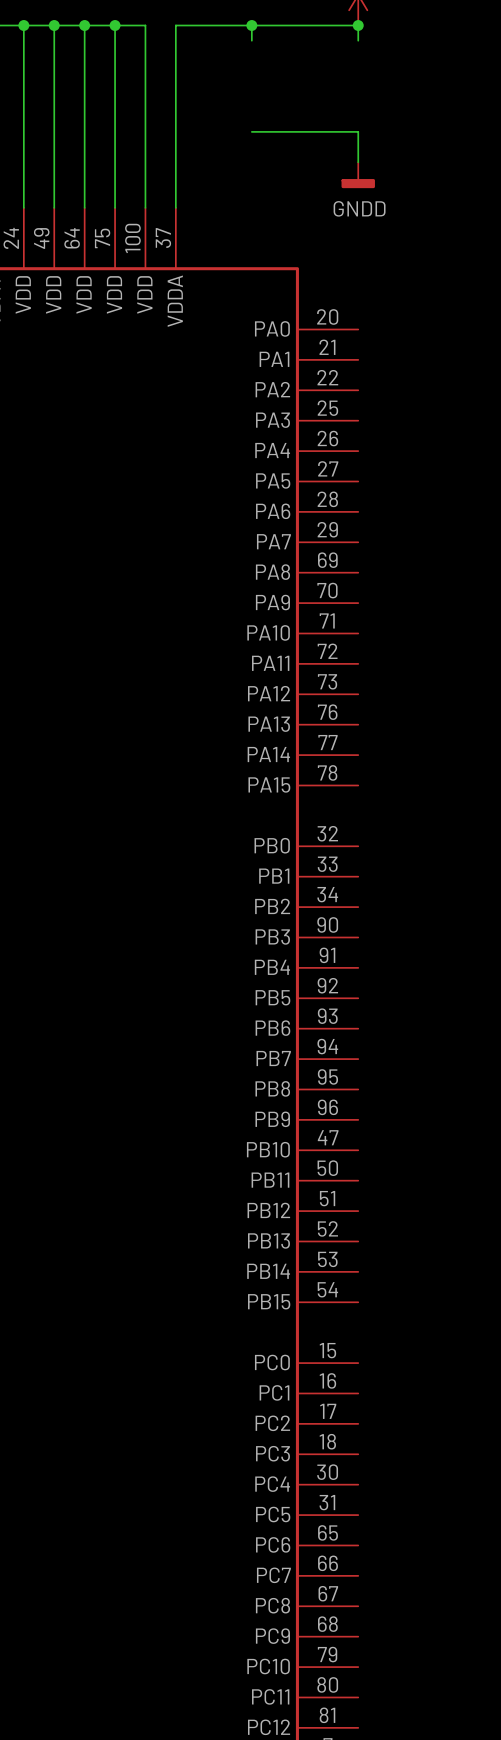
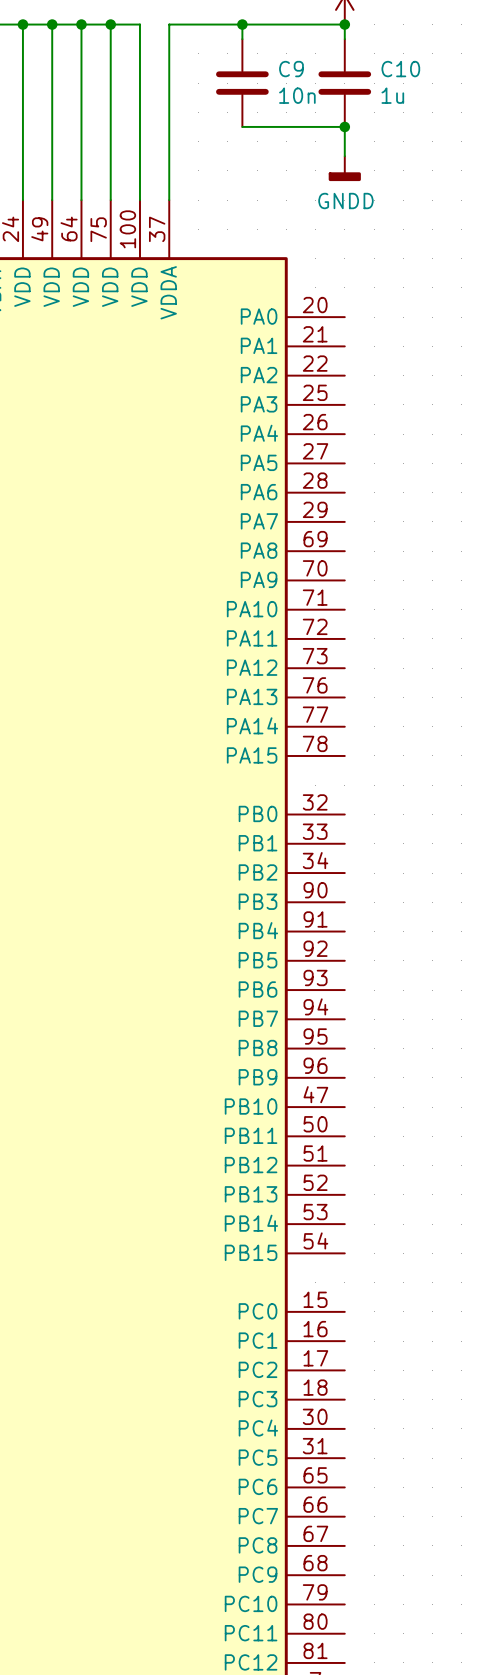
C9: none -> 10n (242, 83)
C10: none -> 1u (344, 83)
junction: none -> (344, 126)

